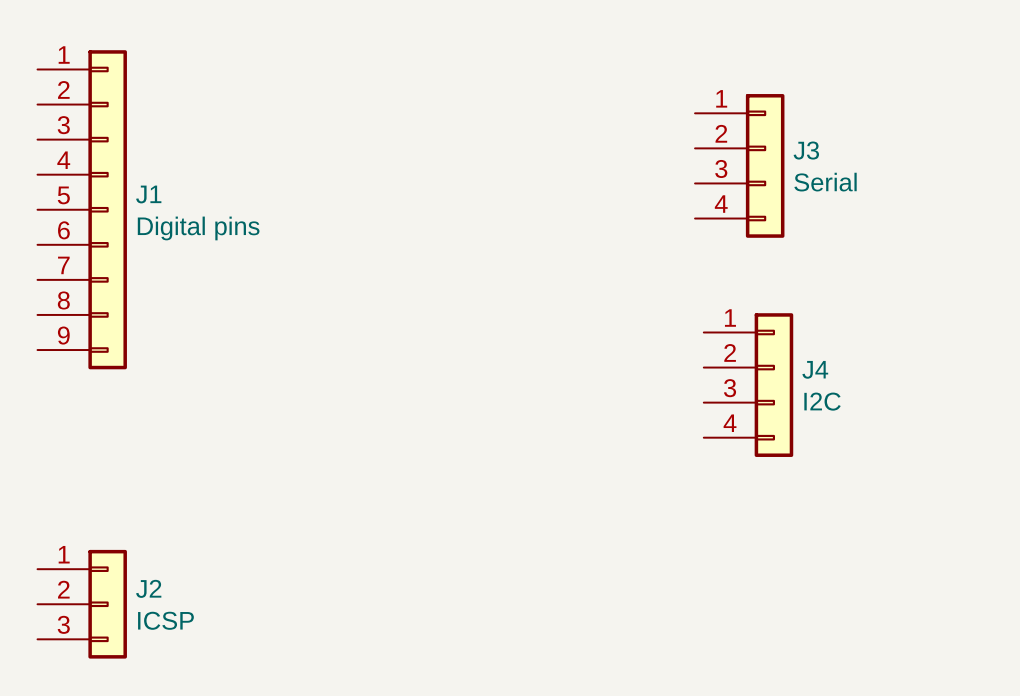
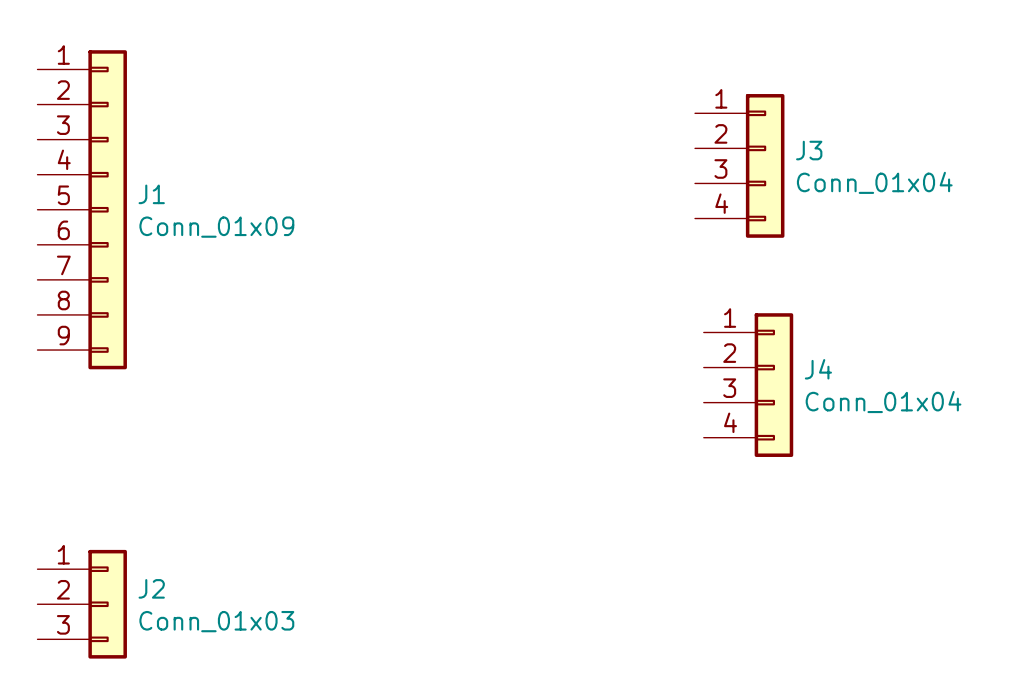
J3 value: Serial (825, 182) -> Conn_01x04 (874, 182)
J1 value: Digital pins (198, 228) -> Conn_01x09 (216, 227)
J4 value: I2C (822, 401) -> Conn_01x04 (883, 402)
J2 value: ICSP (165, 620) -> Conn_01x03 (216, 621)

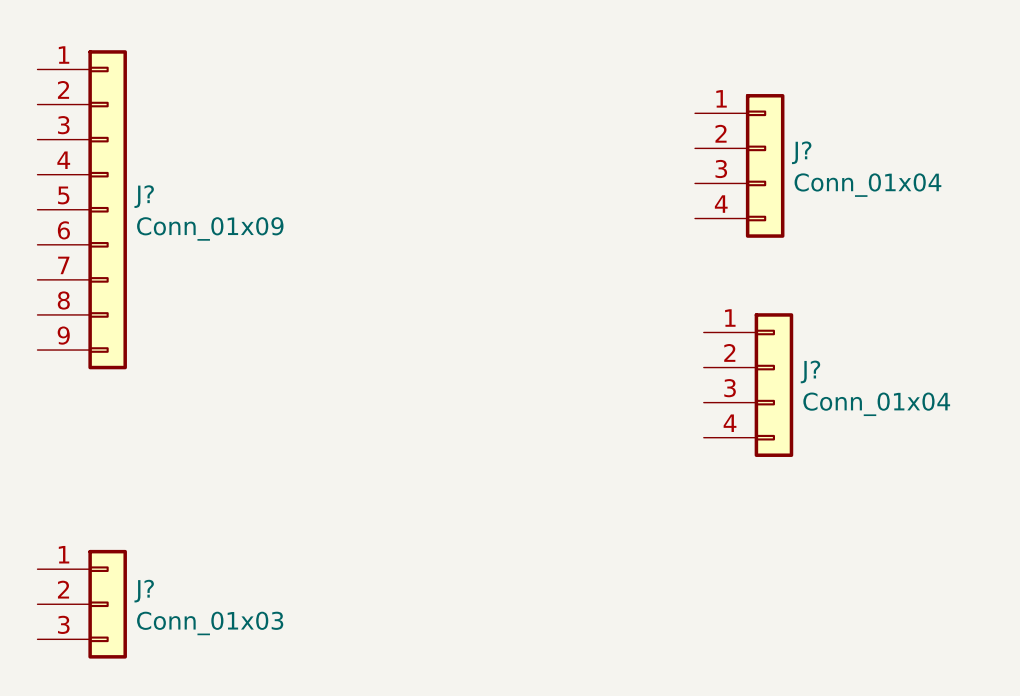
J3 name: J3 (809, 150) -> J? (801, 152)
J1 name: J1 (151, 194) -> J? (144, 196)
J4 name: J4 (818, 369) -> J? (810, 371)
J2 name: J2 (151, 588) -> J? (144, 591)

